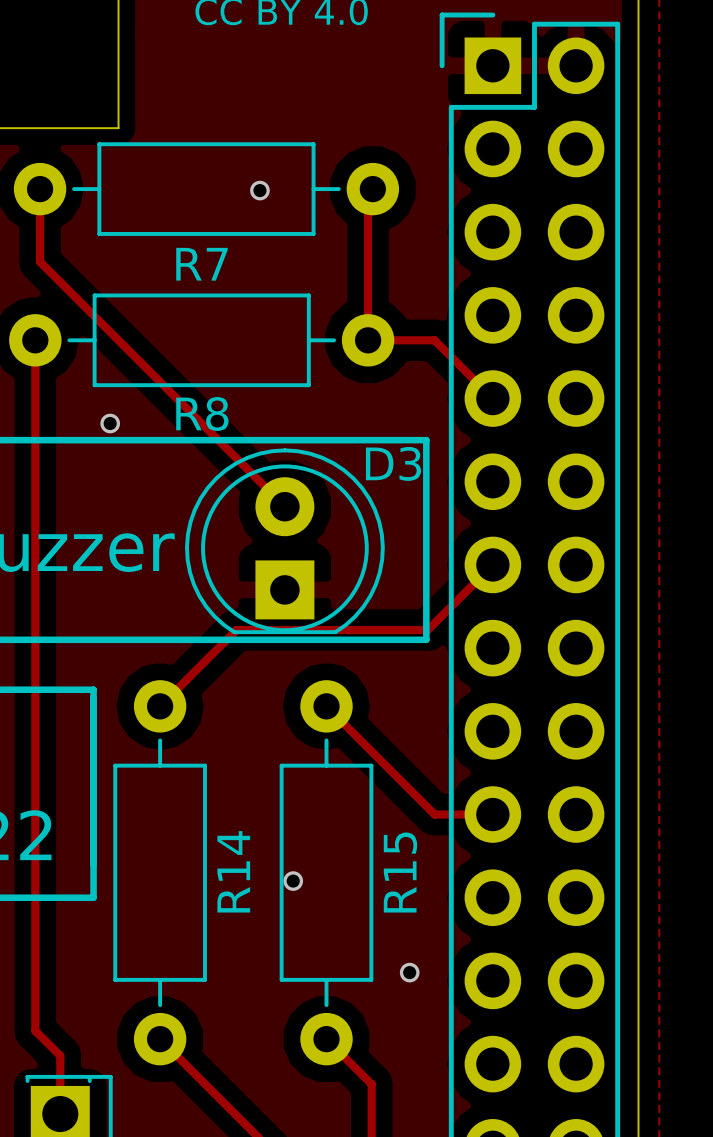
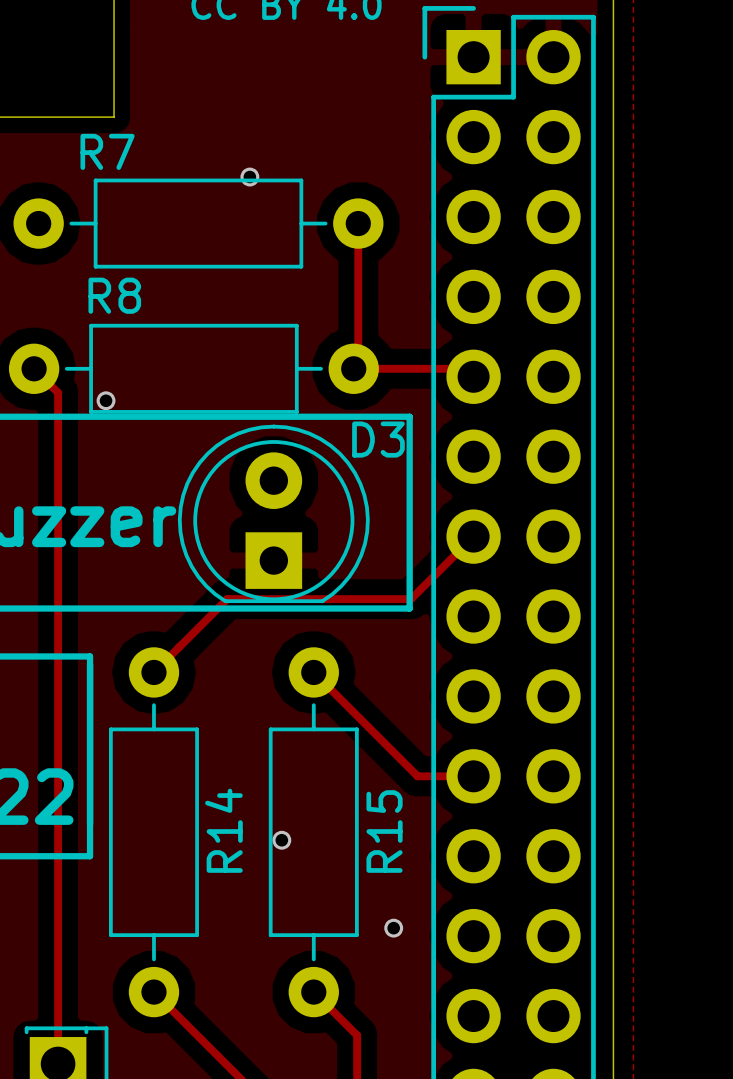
track: (40, 189) (40, 261) (284, 506) -> none
R7 position: (206, 189) -> (198, 223)
track: (372, 189) (368, 193) (368, 340) (434, 340) (484, 390) -> (358, 223) (358, 364) (353, 368) (465, 368)
R7 name position: R7 (202, 264) -> R7 (107, 151)
track: (35, 340) (35, 1030) (60, 1055) -> (34, 368) (58, 392) (58, 1008)
R8 position: (201, 340) -> (193, 368)
R8 name position: R8 (202, 413) -> R8 (114, 295)

